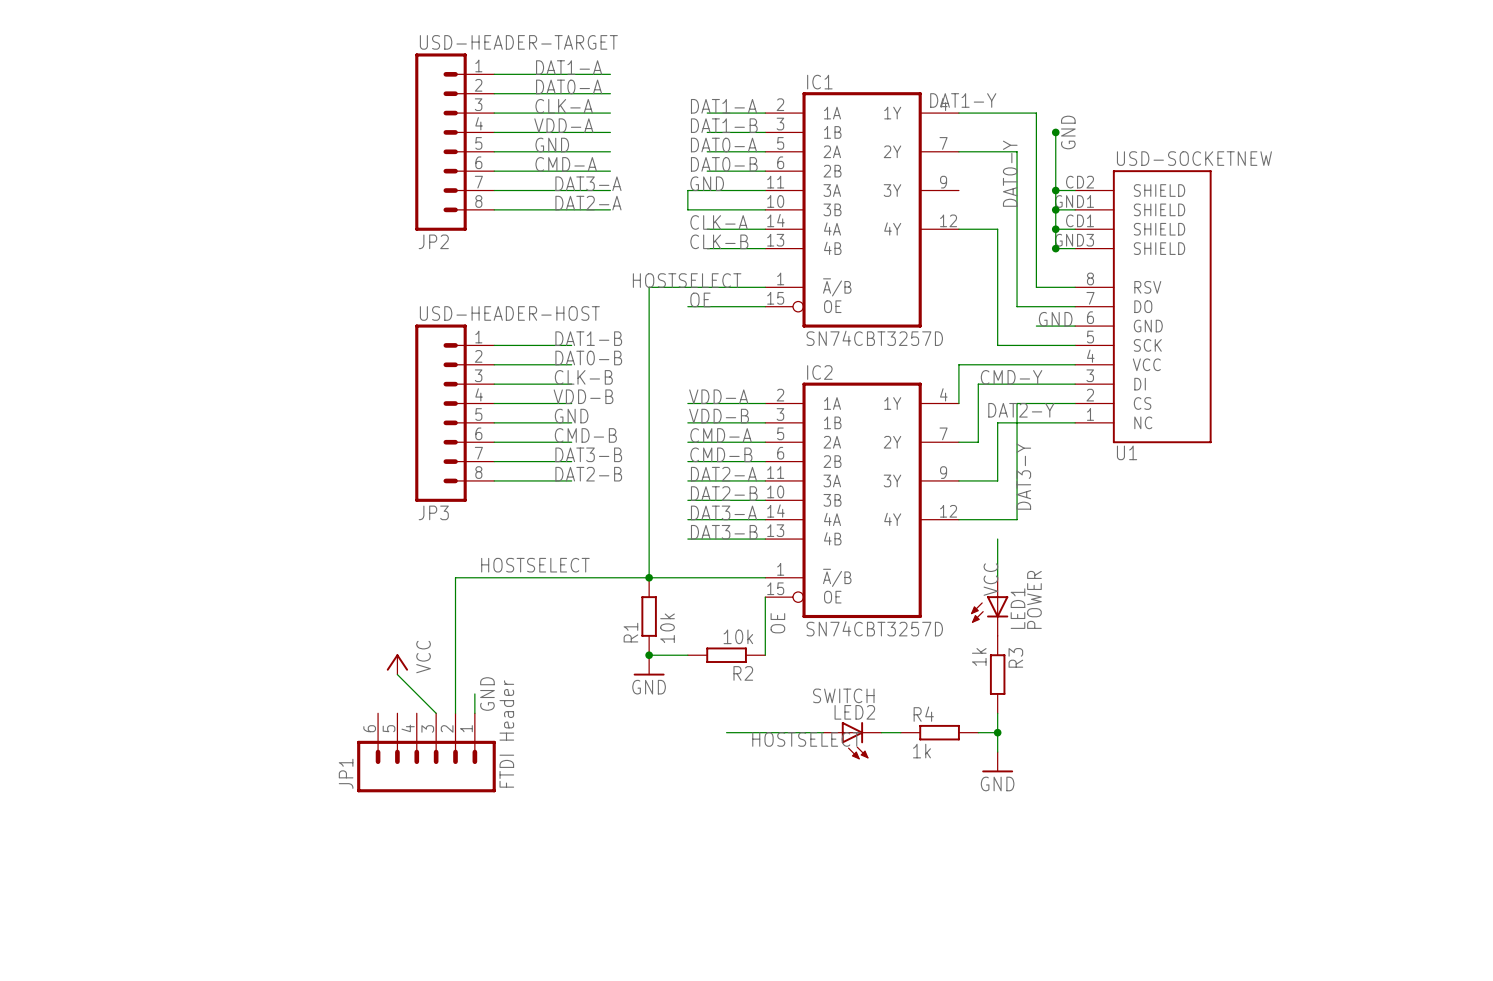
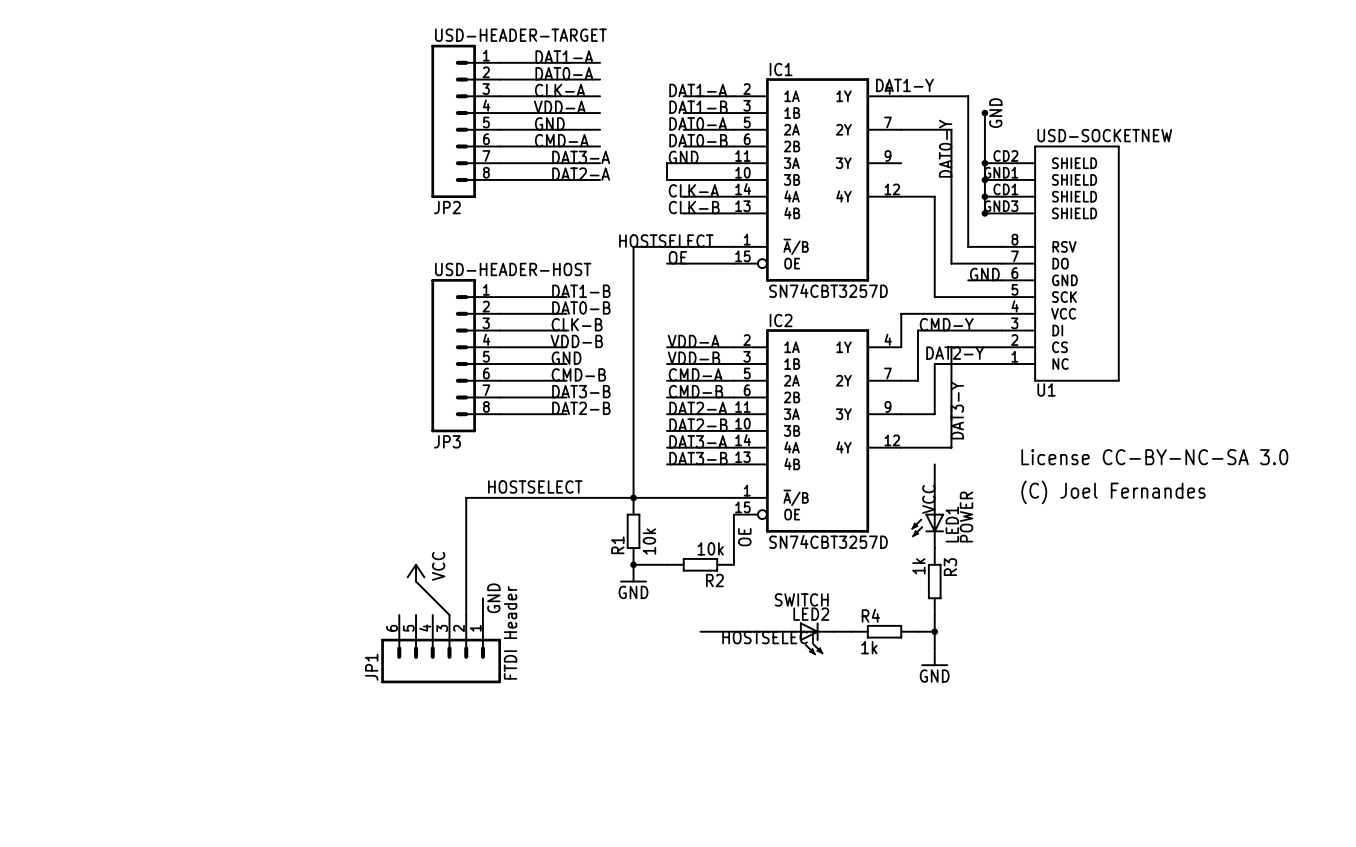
text: none -> License CC-BY-NC-SA 3.0 (1154, 457)
text: none -> (C) Joel Fernandes (1113, 492)

